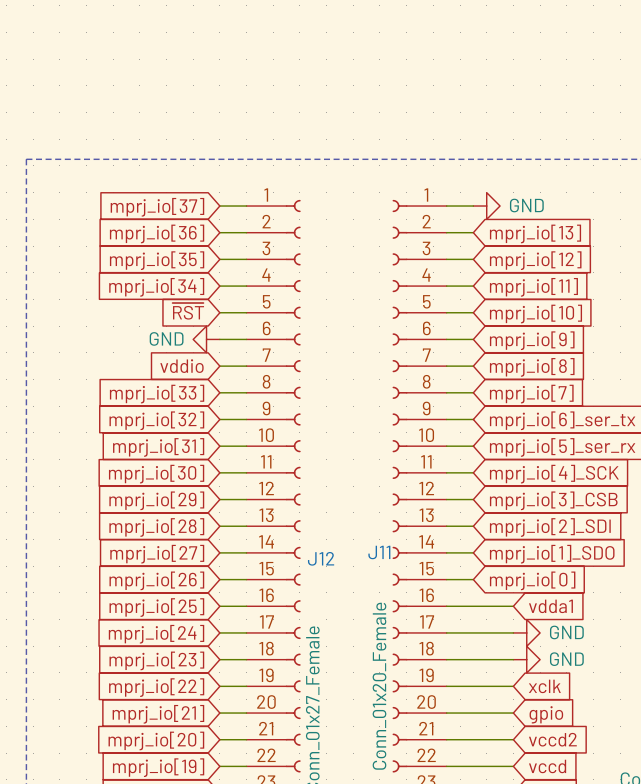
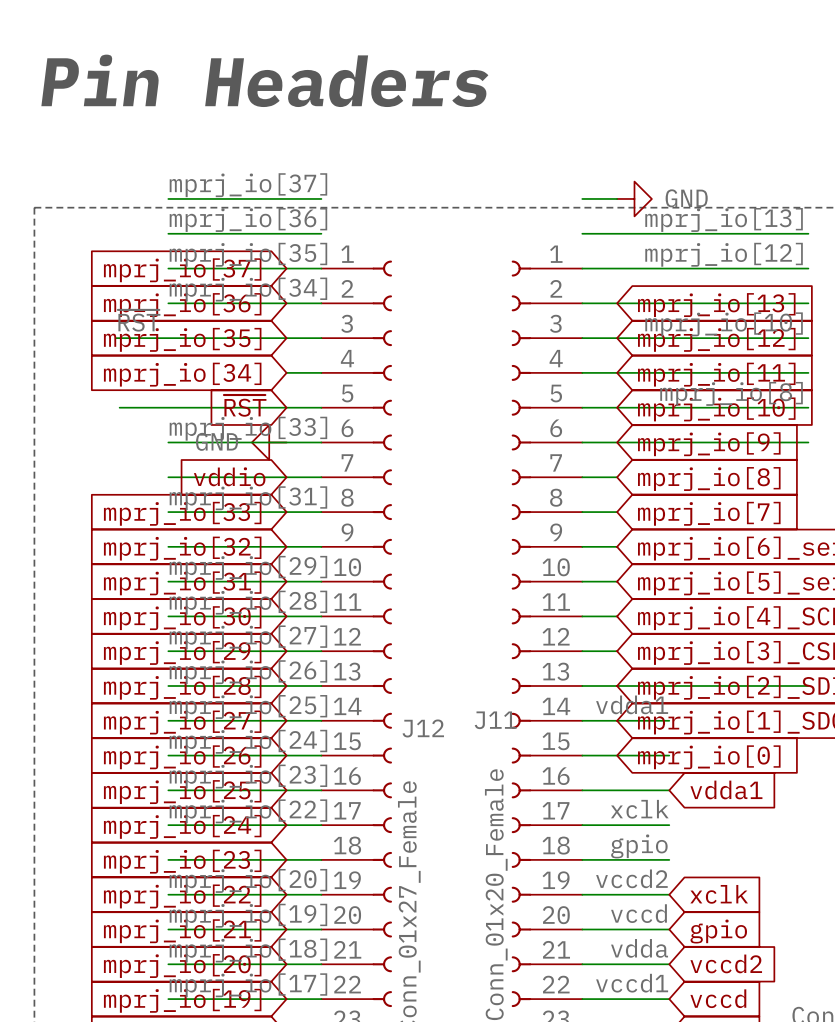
text: none -> Pin Headers (264, 80)
label: none -> mprj_io[37] (248, 185)
wire: none -> (168, 198) (321, 198)
wire: none -> (582, 198) (617, 198)
label: none -> mprj_io[36] (248, 219)
label: none -> mprj_io[13] (724, 219)
wire: none -> (168, 233) (321, 233)
wire: none -> (582, 233) (808, 233)
label: none -> mprj_io[35] (248, 254)
label: none -> mprj_io[12] (724, 254)
wire: none -> (168, 268) (286, 268)
wire: none -> (617, 268) (808, 268)
power symbol position: GND (486, 206) -> GND (634, 198)
label: none -> mprj_io[34] (248, 289)
wire: none -> (168, 303) (286, 303)
wire: none -> (617, 303) (808, 303)
label: none -> ~{RST} (139, 320)
label: none -> mprj_io[10] (724, 324)
wire: none -> (116, 338) (286, 338)
wire: none -> (617, 338) (808, 338)
wire: none -> (617, 372) (808, 372)
label: none -> mprj_io[8] (731, 393)
wire: none -> (119, 407) (286, 407)
wire: none -> (617, 407) (808, 407)
label: none -> mprj_io[33] (248, 428)
wire: none -> (168, 442) (286, 442)
wire: none -> (617, 442) (808, 442)
wire: none -> (168, 477) (286, 477)
label: none -> mprj_io[31] (248, 498)
wire: none -> (168, 512) (286, 512)
wire: none -> (168, 546) (286, 546)
label: none -> mprj_io[29] (248, 567)
wire: none -> (168, 581) (286, 581)
label: none -> mprj_io[28] (248, 602)
wire: none -> (168, 616) (286, 616)
label: none -> mprj_io[27] (248, 637)
wire: none -> (168, 651) (286, 651)
label: none -> mprj_io[26] (248, 672)
wire: none -> (168, 686) (286, 686)
wire: none -> (617, 686) (808, 686)
label: none -> vdda1 (632, 704)
label: none -> mprj_io[25] (248, 706)
wire: none -> (168, 720) (286, 720)
wire: none -> (617, 720) (669, 720)
label: none -> mprj_io[24] (248, 741)
wire: none -> (168, 755) (286, 755)
wire: none -> (617, 755) (669, 755)
label: none -> mprj_io[23] (248, 776)
wire: none -> (168, 790) (286, 790)
label: none -> xclk (639, 809)
label: none -> mprj_io[22] (248, 811)
wire: none -> (168, 825) (286, 825)
power symbol: GND (526, 632) -> none
label: none -> gpio (639, 846)
wire: none -> (168, 859) (286, 859)
power symbol: GND (526, 659) -> none
label: none -> vccd2 (631, 878)
label: none -> mprj_io[20] (248, 880)
wire: none -> (168, 894) (286, 894)
label: none -> vccd (638, 913)
label: none -> mprj_io[19] (248, 915)
wire: none -> (168, 929) (286, 929)
label: none -> vdda (639, 948)
label: none -> mprj_io[18] (248, 950)
wire: none -> (168, 964) (286, 964)
label: none -> vccd1 (632, 983)
label: none -> mprj_io[17] (248, 985)
wire: none -> (168, 999) (286, 999)

